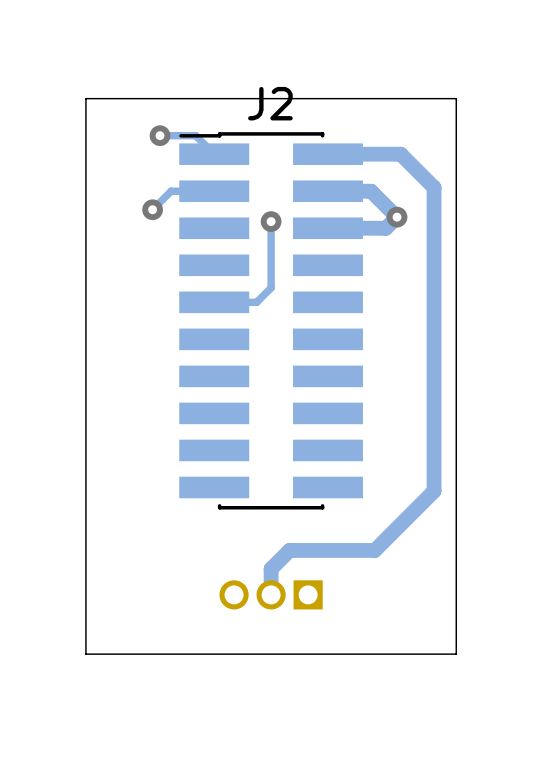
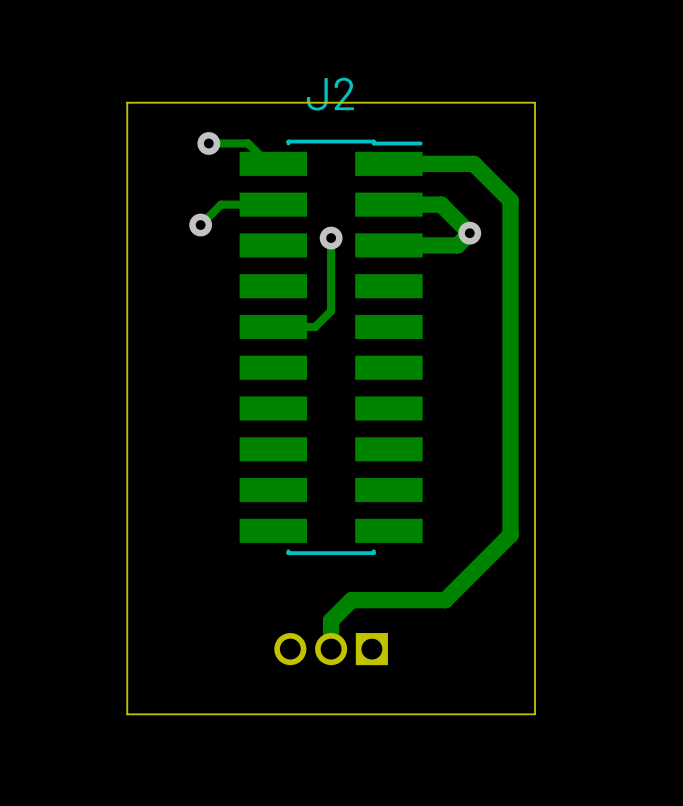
J2 footprint: [179, 132, 363, 510] -> [239, 139, 423, 556]

